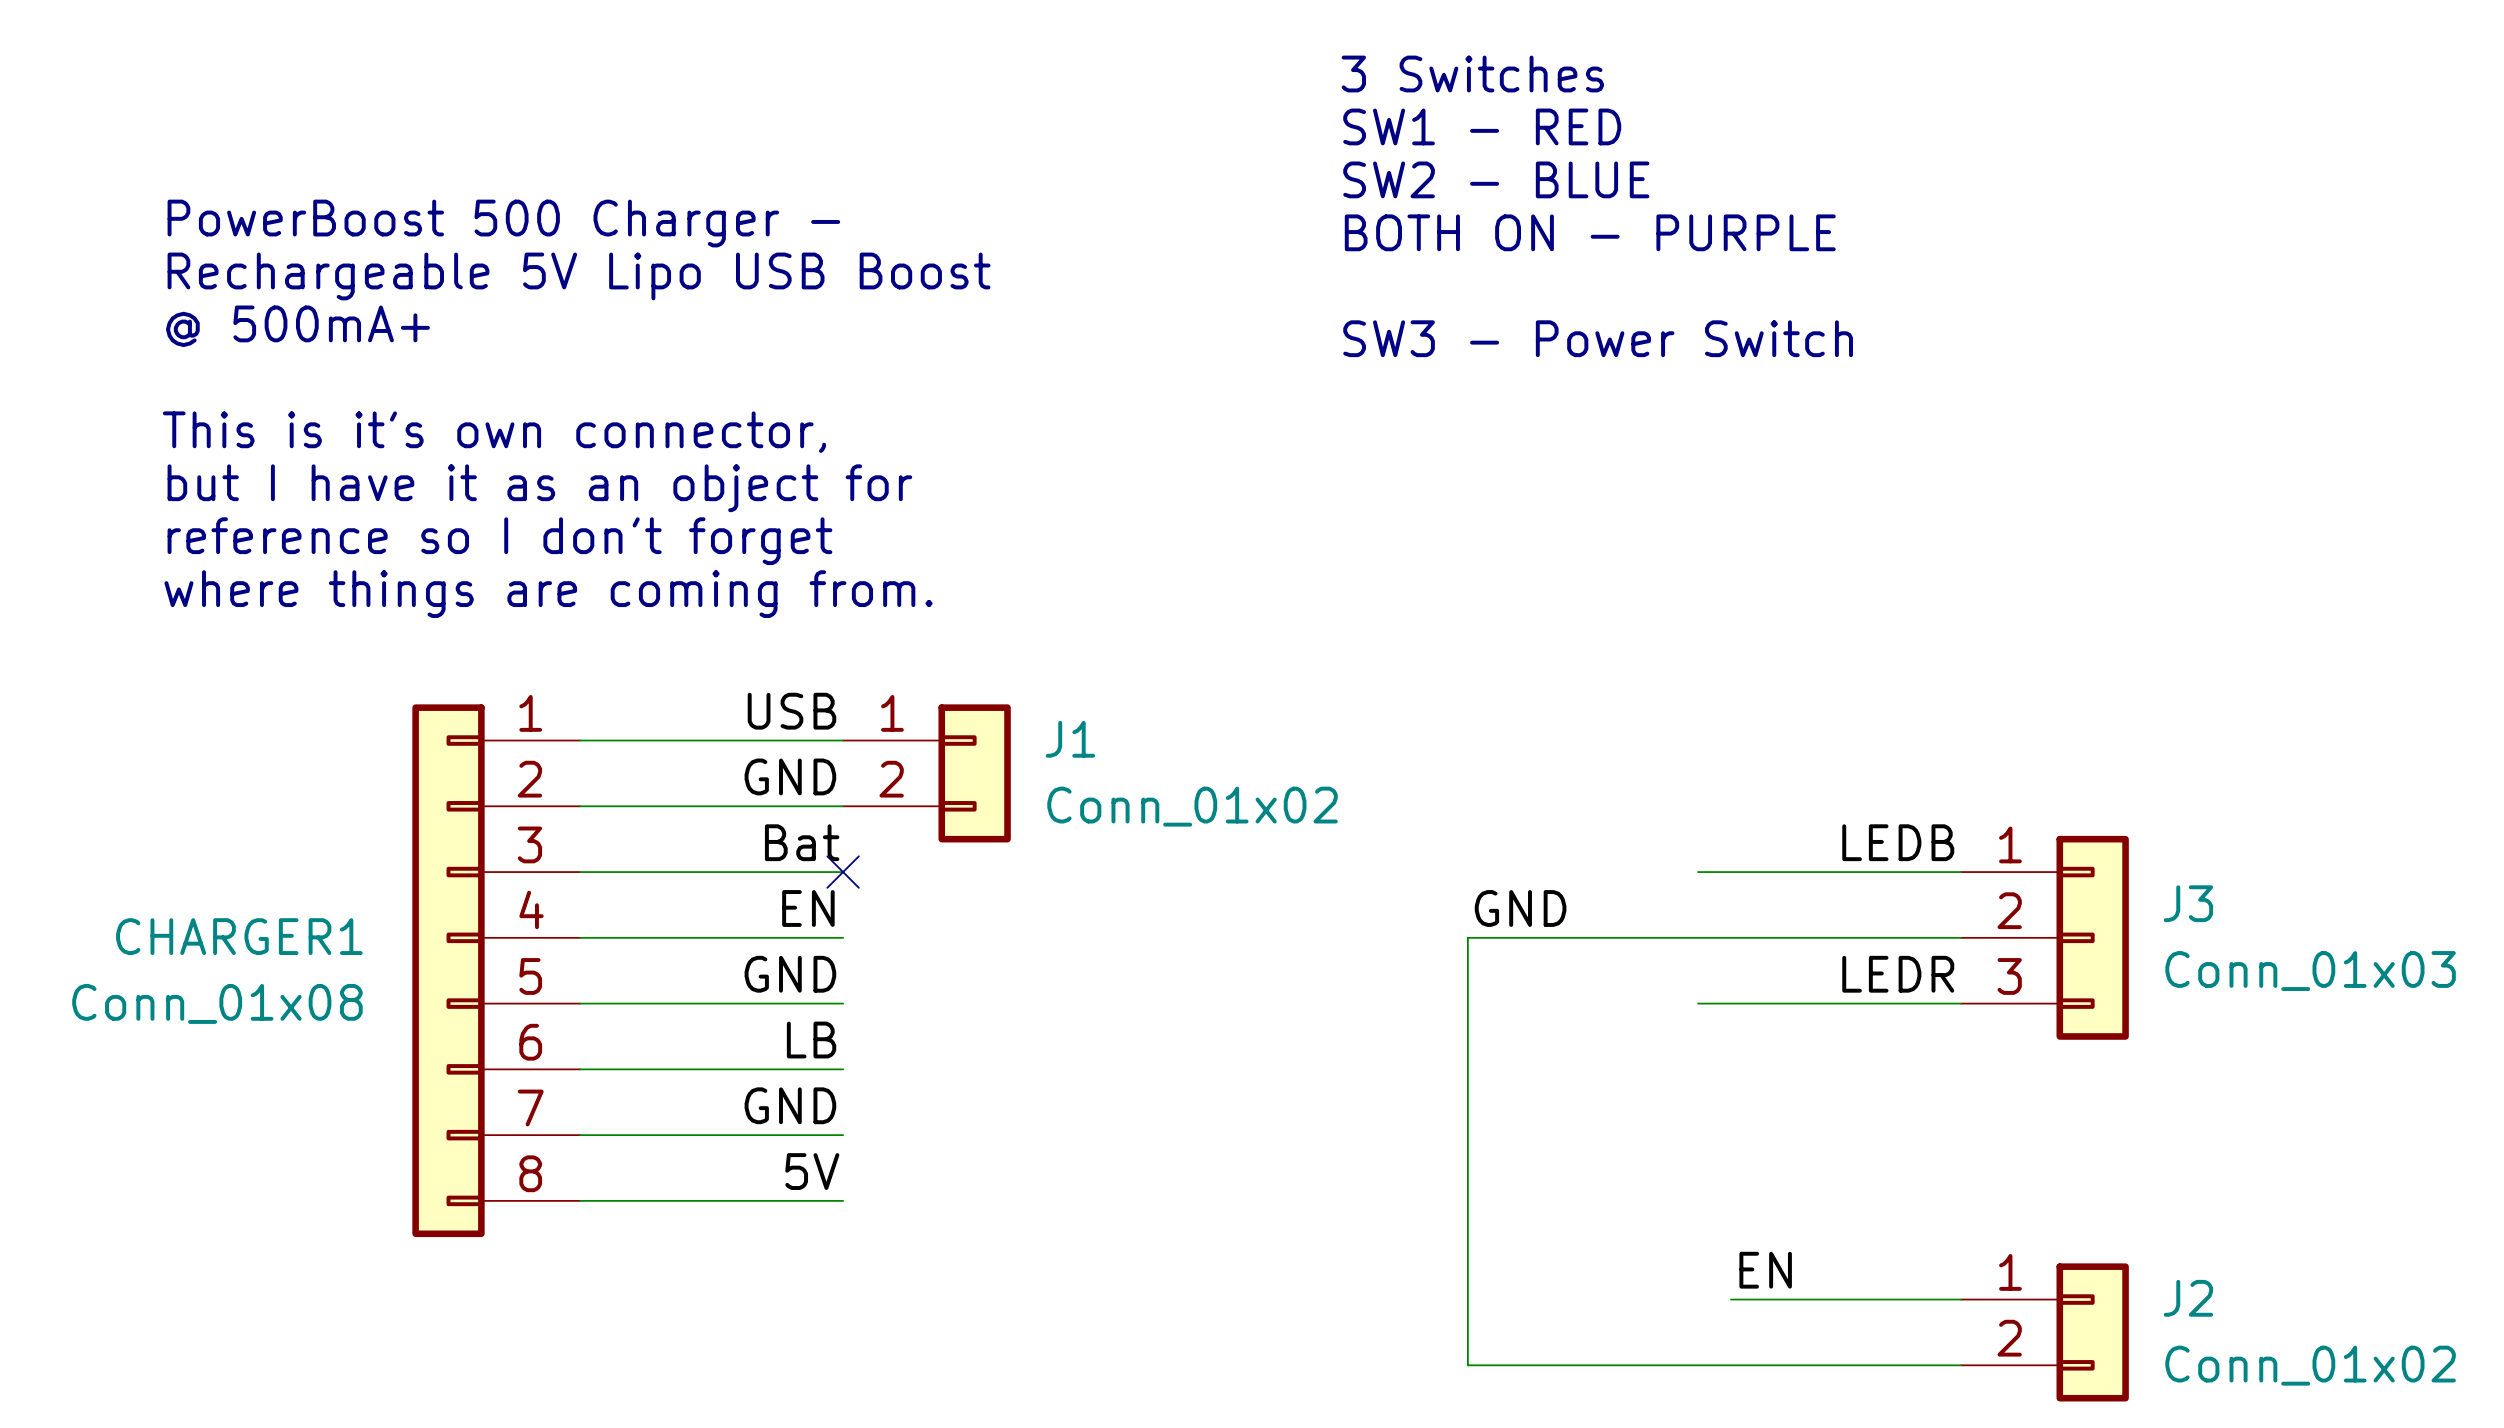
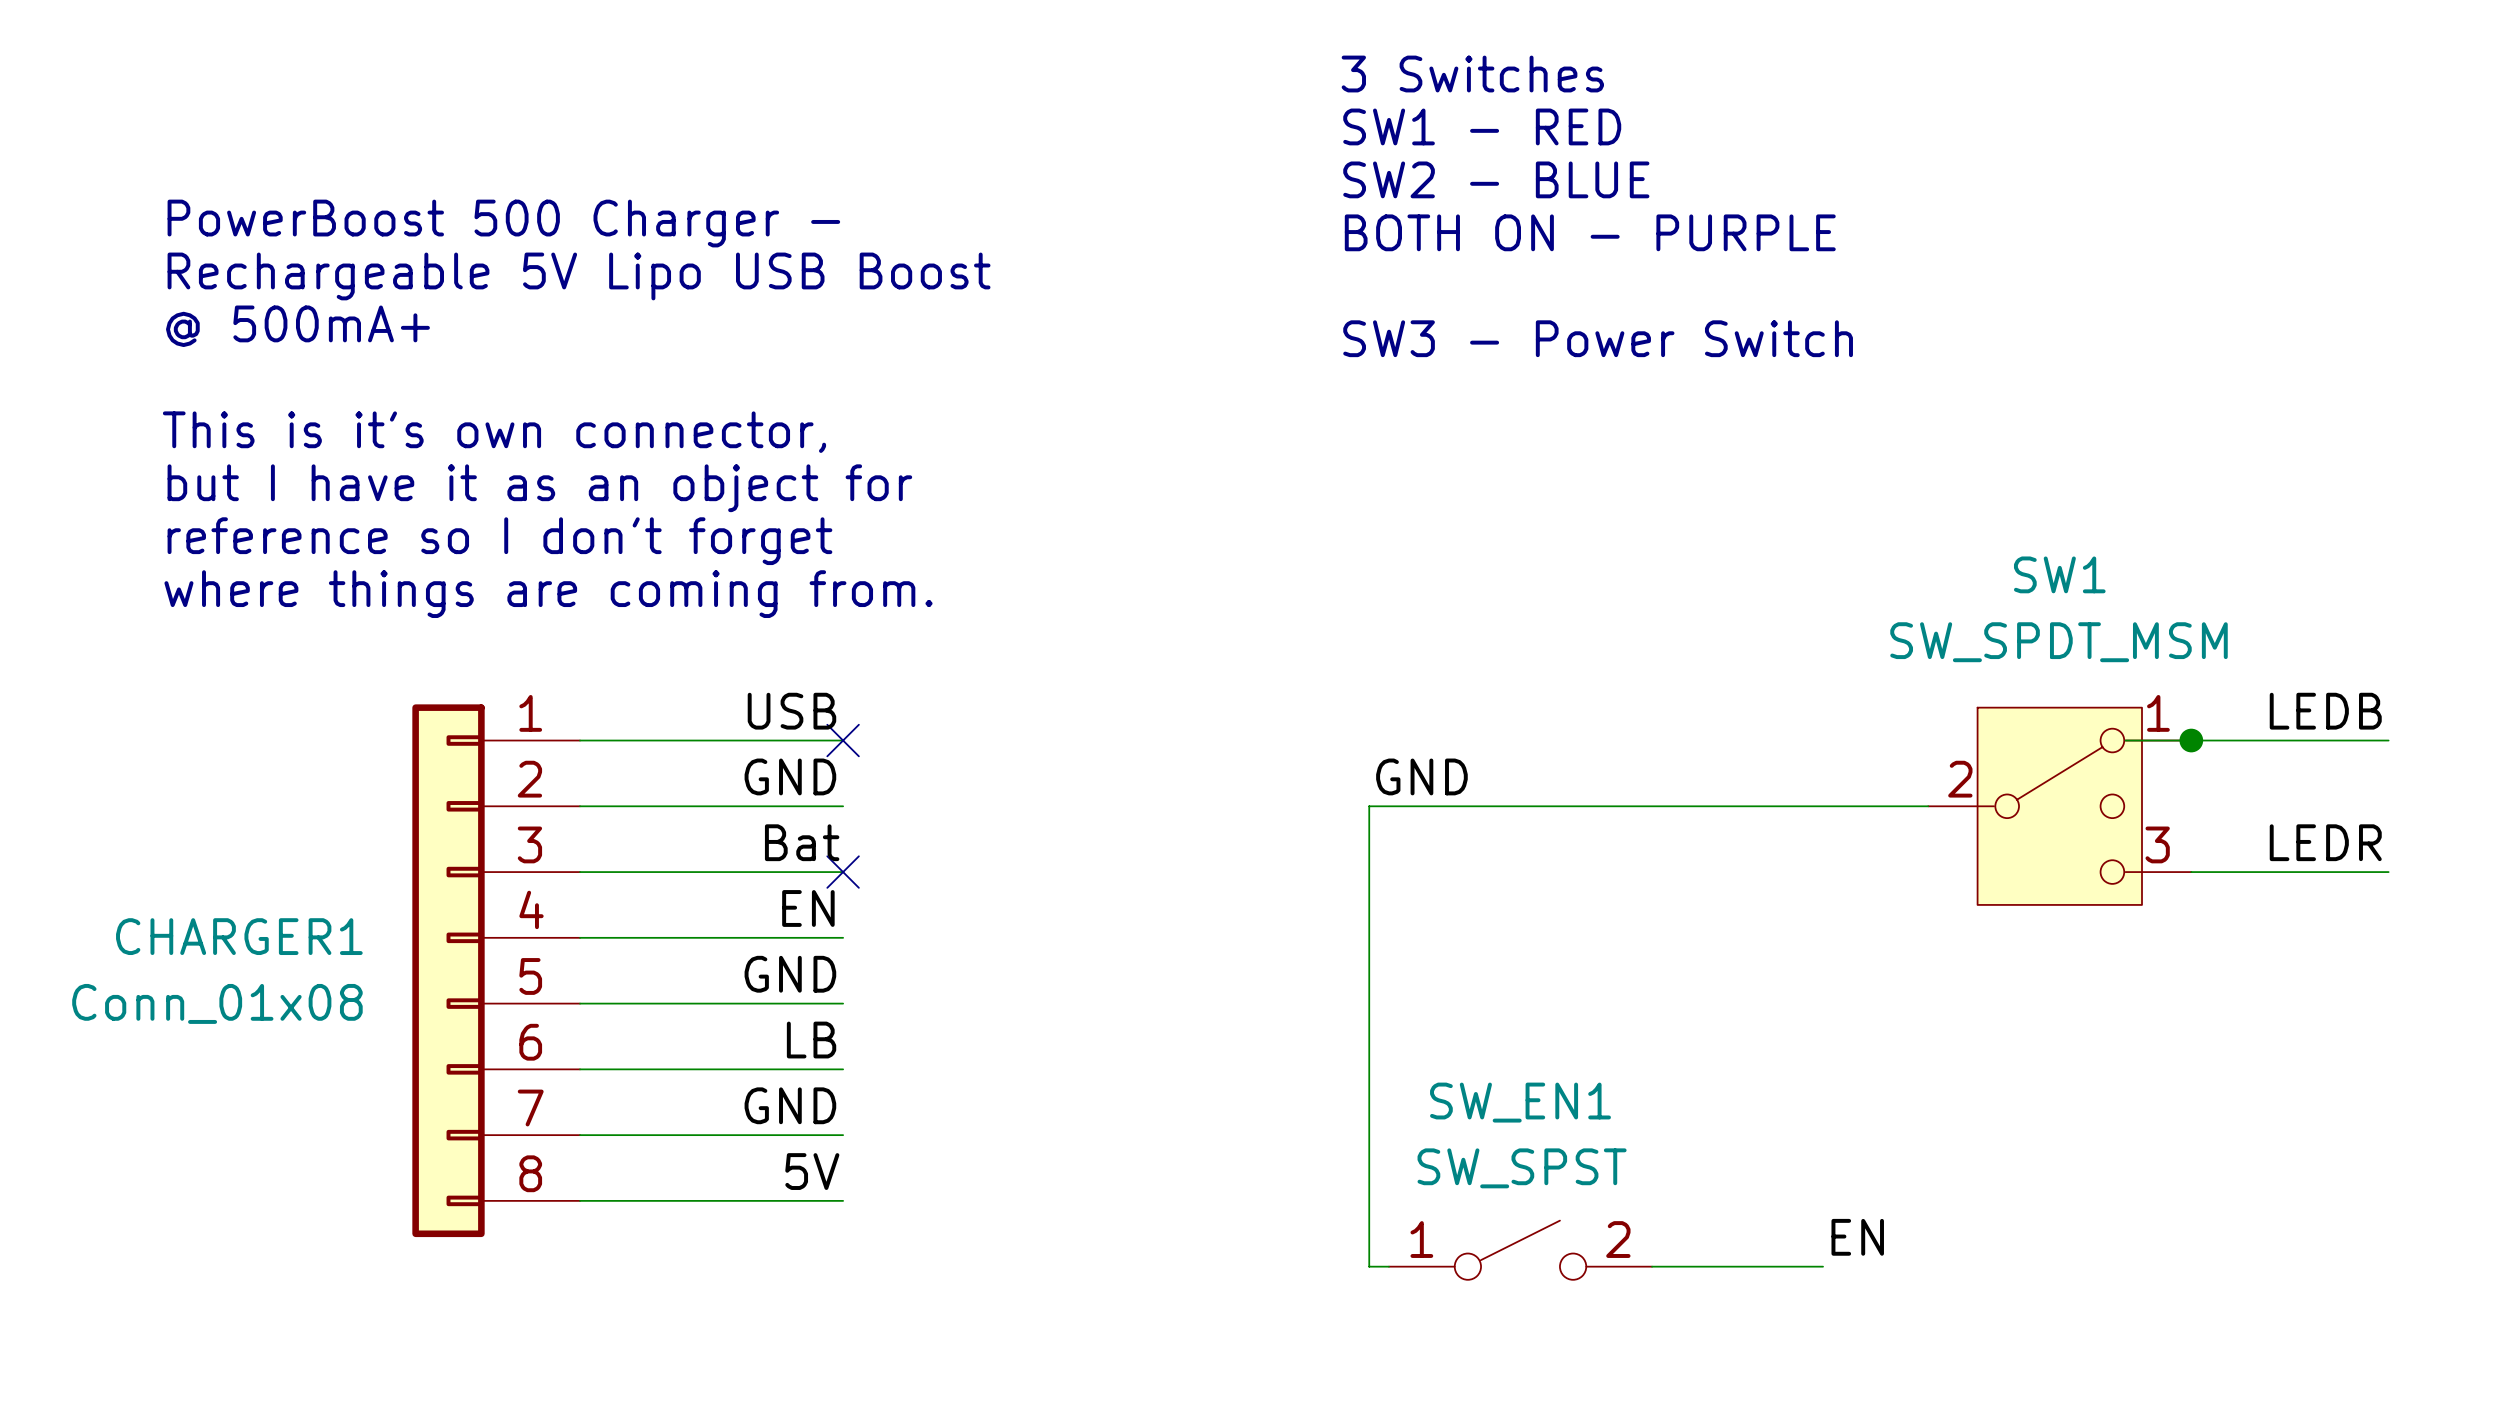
no-connect mark: none -> (843, 740)
junction: none -> (2191, 740)
J1: Conn_01x02 (926, 773) -> none
wire: none -> (1928, 806) (1369, 806) (1369, 1266) (1388, 1266)
SW1: none -> SW_SPDT_MSM (2059, 806)
label position: LEDB (1898, 842) -> LEDB (2325, 711)
wire: (1698, 872) (1961, 872) -> (2125, 740) (2388, 740)
wire: none -> (2191, 872) (2388, 872)
label position: GND (1520, 908) -> GND (1421, 776)
wire: (1961, 937) (1467, 937) (1467, 1365) (1961, 1365) -> none
J3: Conn_01x03 (2044, 937) -> none
label position: LEDR (1898, 974) -> LEDR (2325, 842)
wire: (1698, 1003) (1961, 1003) -> none
SW_EN1: none -> SW_SPST (1520, 1250)
wire: none -> (1652, 1266) (1823, 1266)
label position: EN (1765, 1270) -> EN (1857, 1237)
wire: (1730, 1299) (1961, 1299) -> none
J2: Conn_01x02 (2044, 1332) -> none

